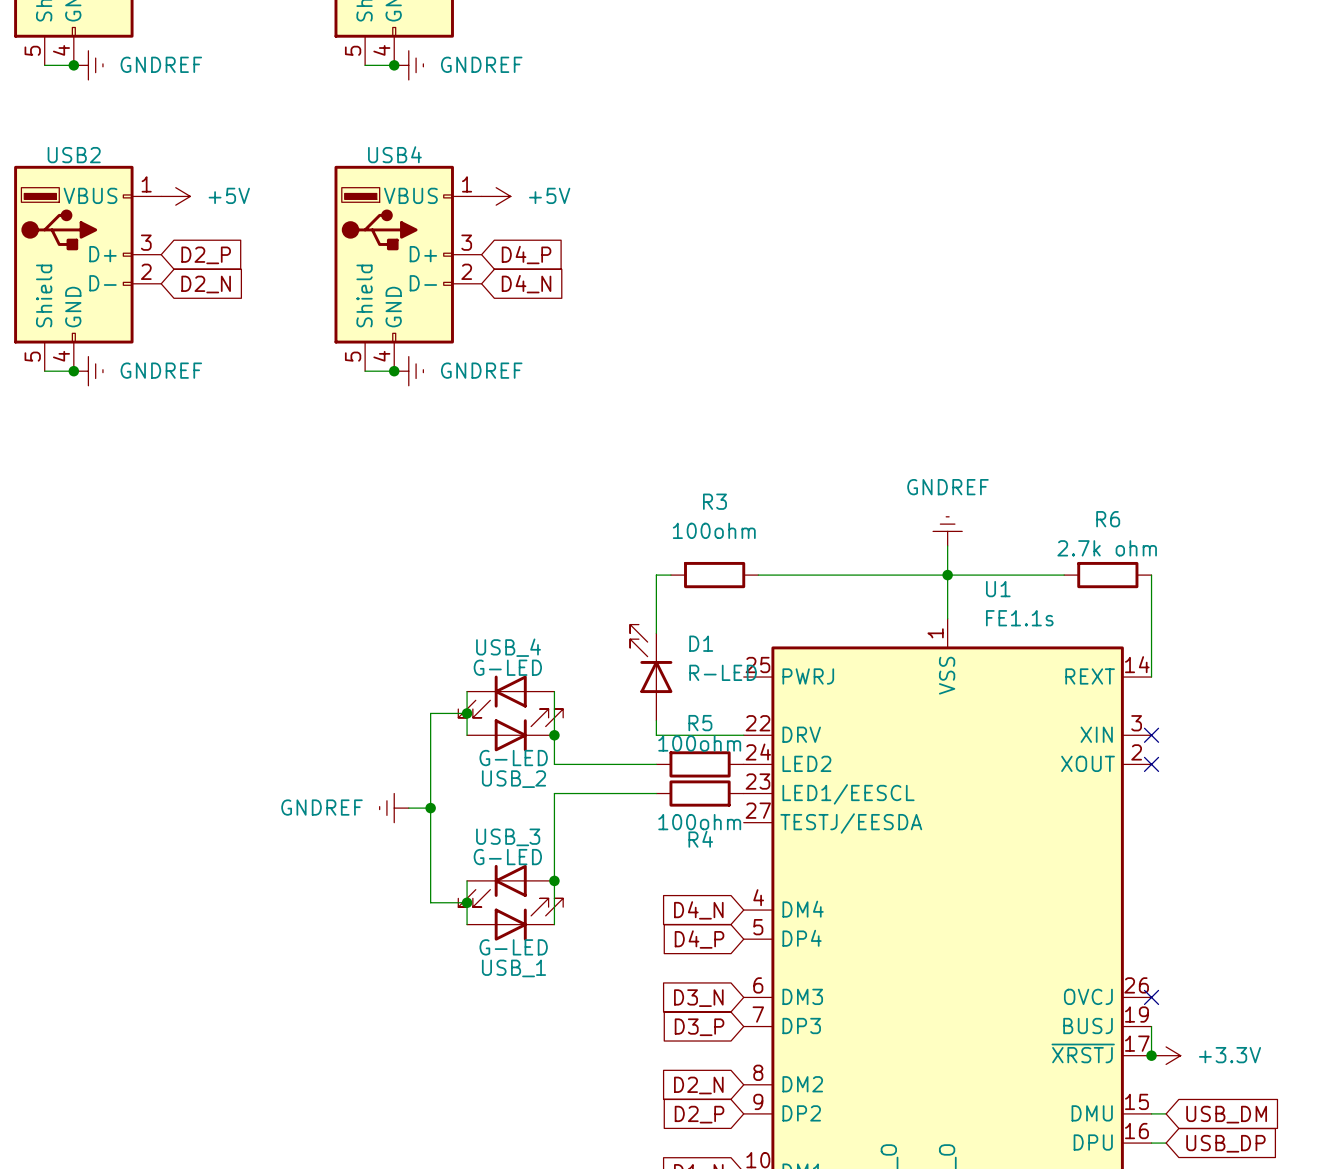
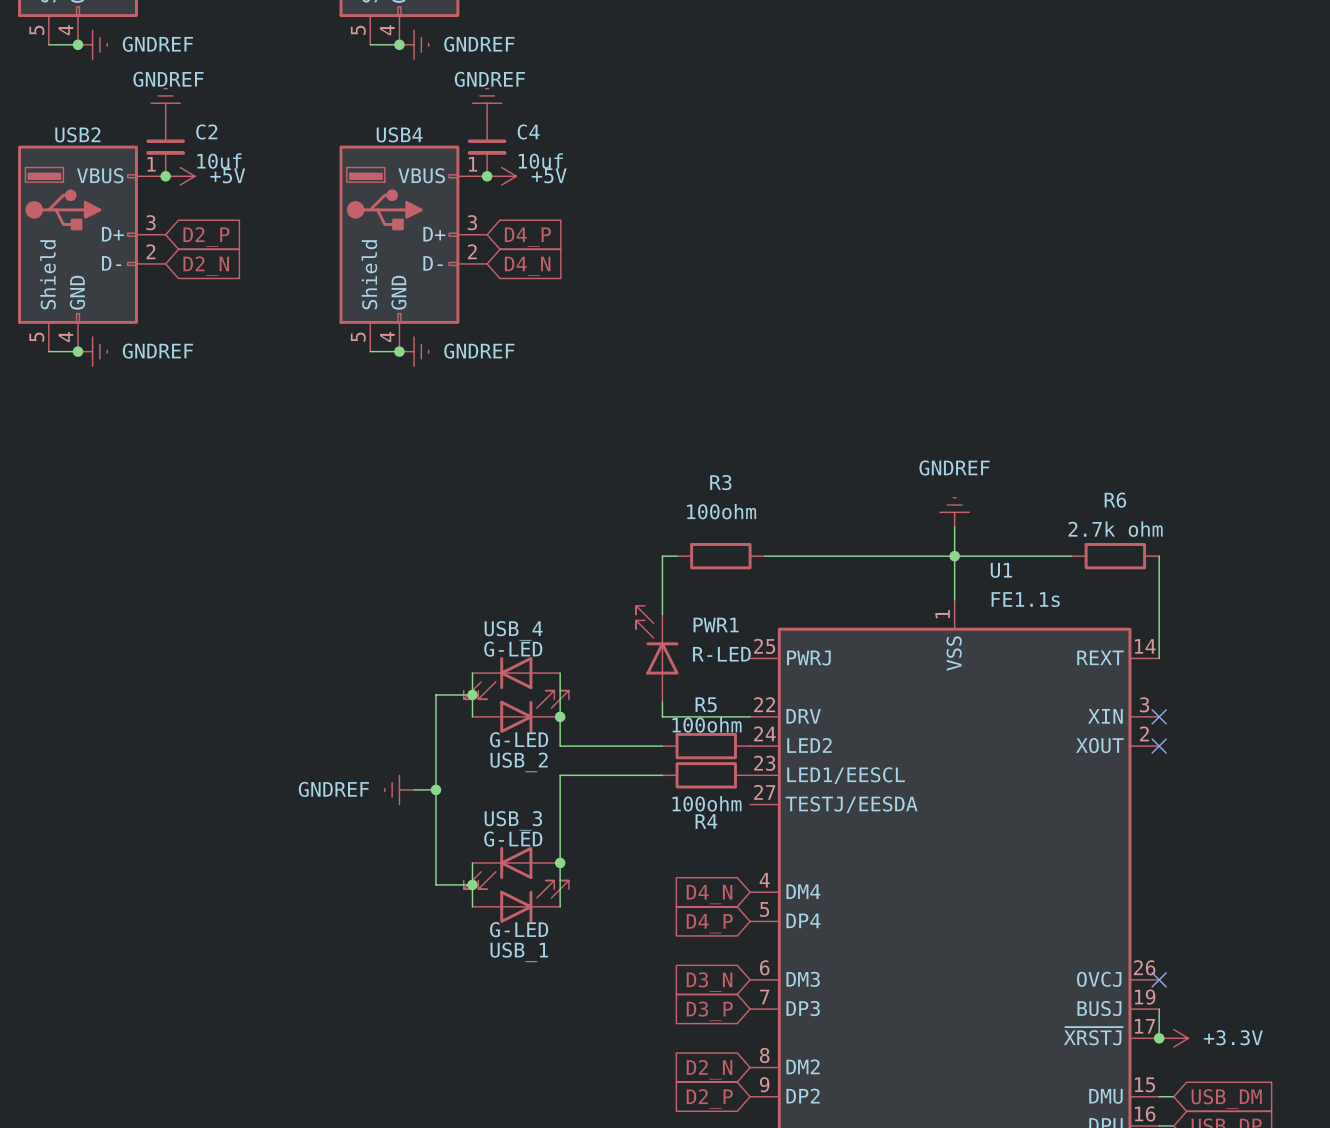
power symbol: none -> GNDREF (165, 103)
power symbol: none -> GNDREF (487, 103)
C2: none -> 10uf (165, 147)
C4: none -> 10uf (487, 147)
junction: none -> (165, 176)
junction: none -> (487, 176)
D1 name: D1 (701, 643) -> PWR1 (716, 625)

